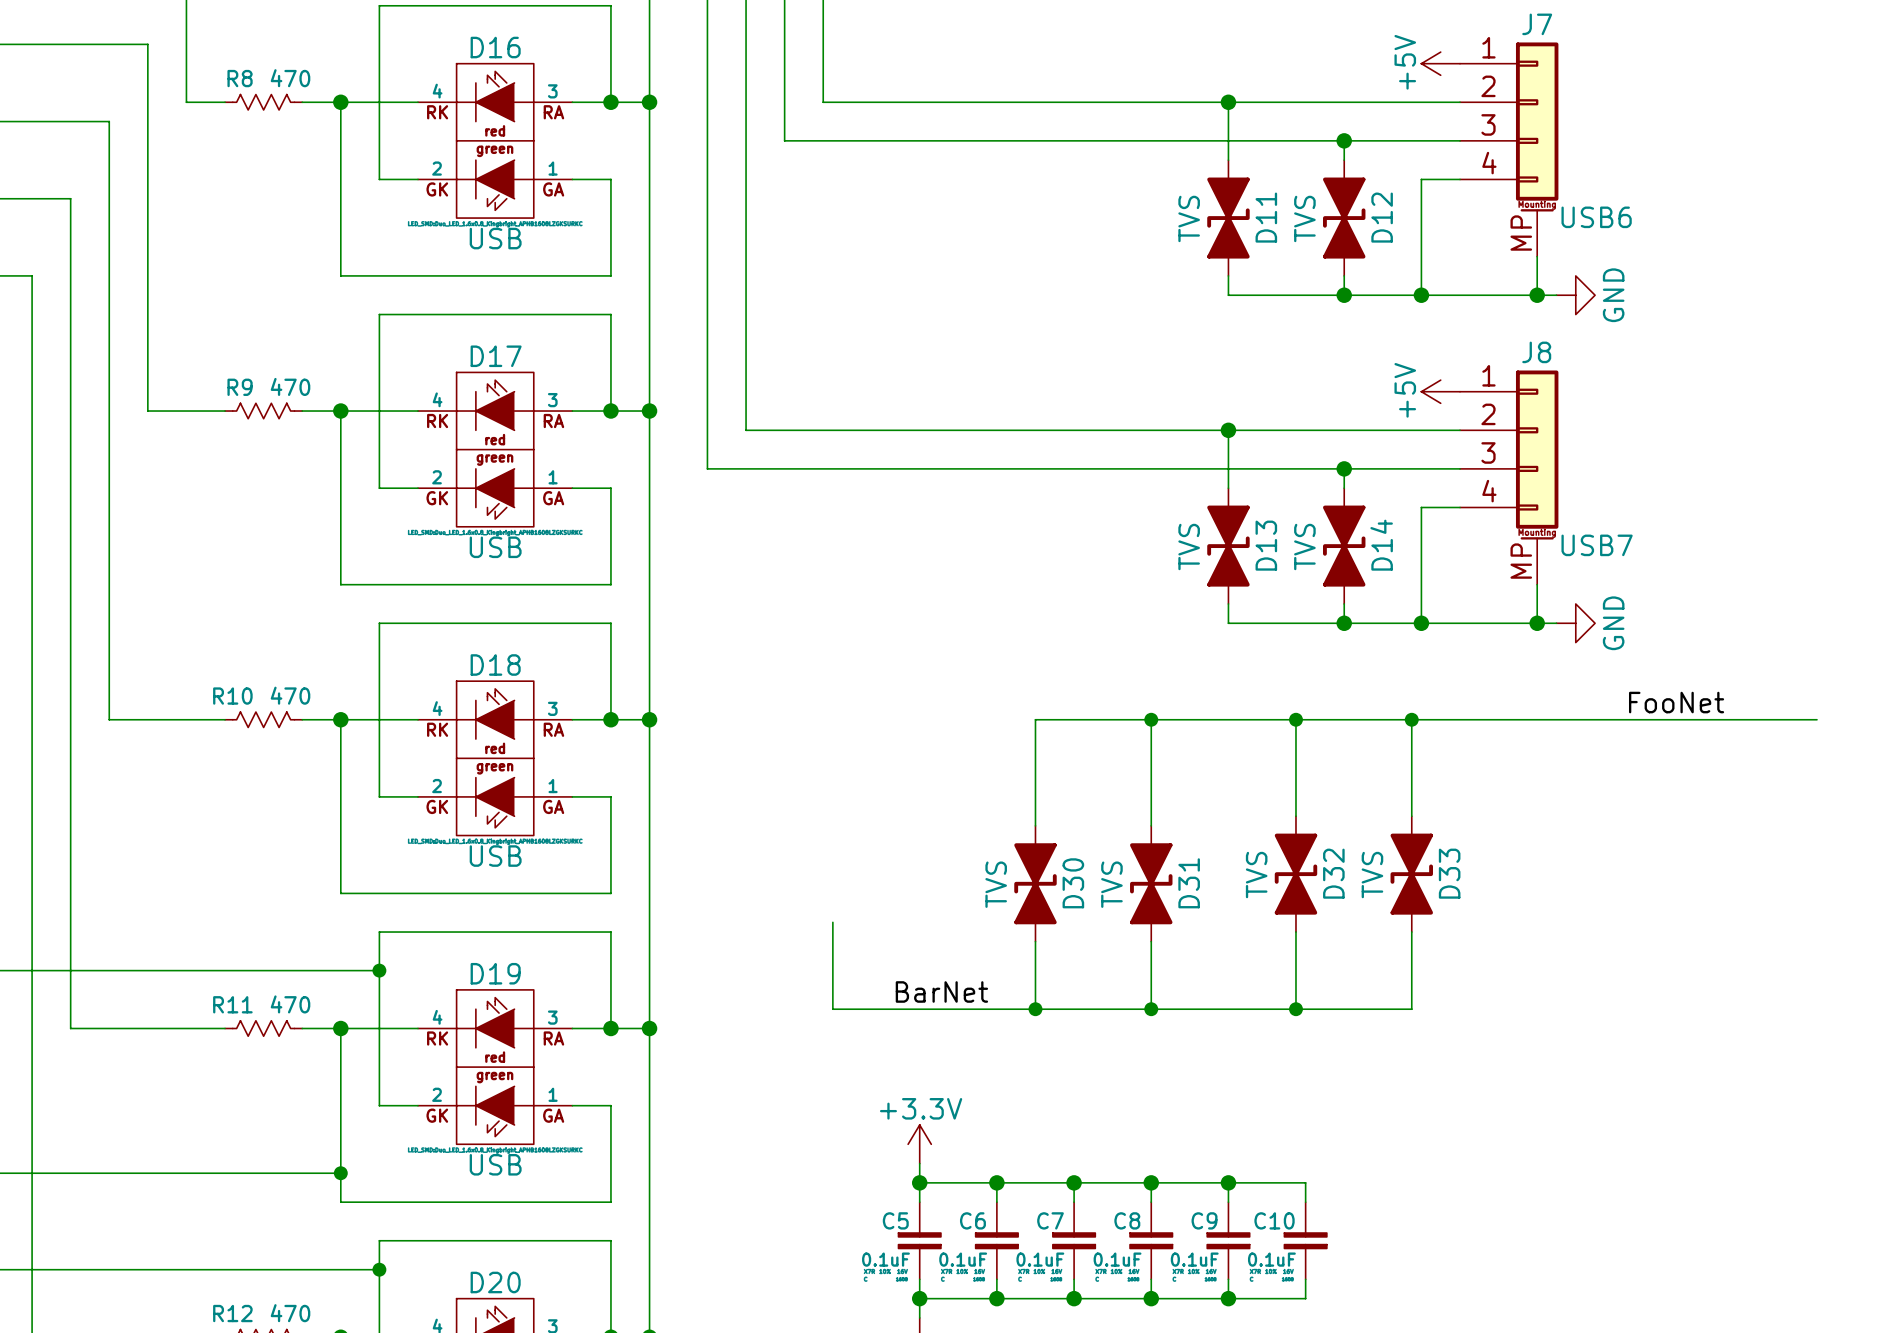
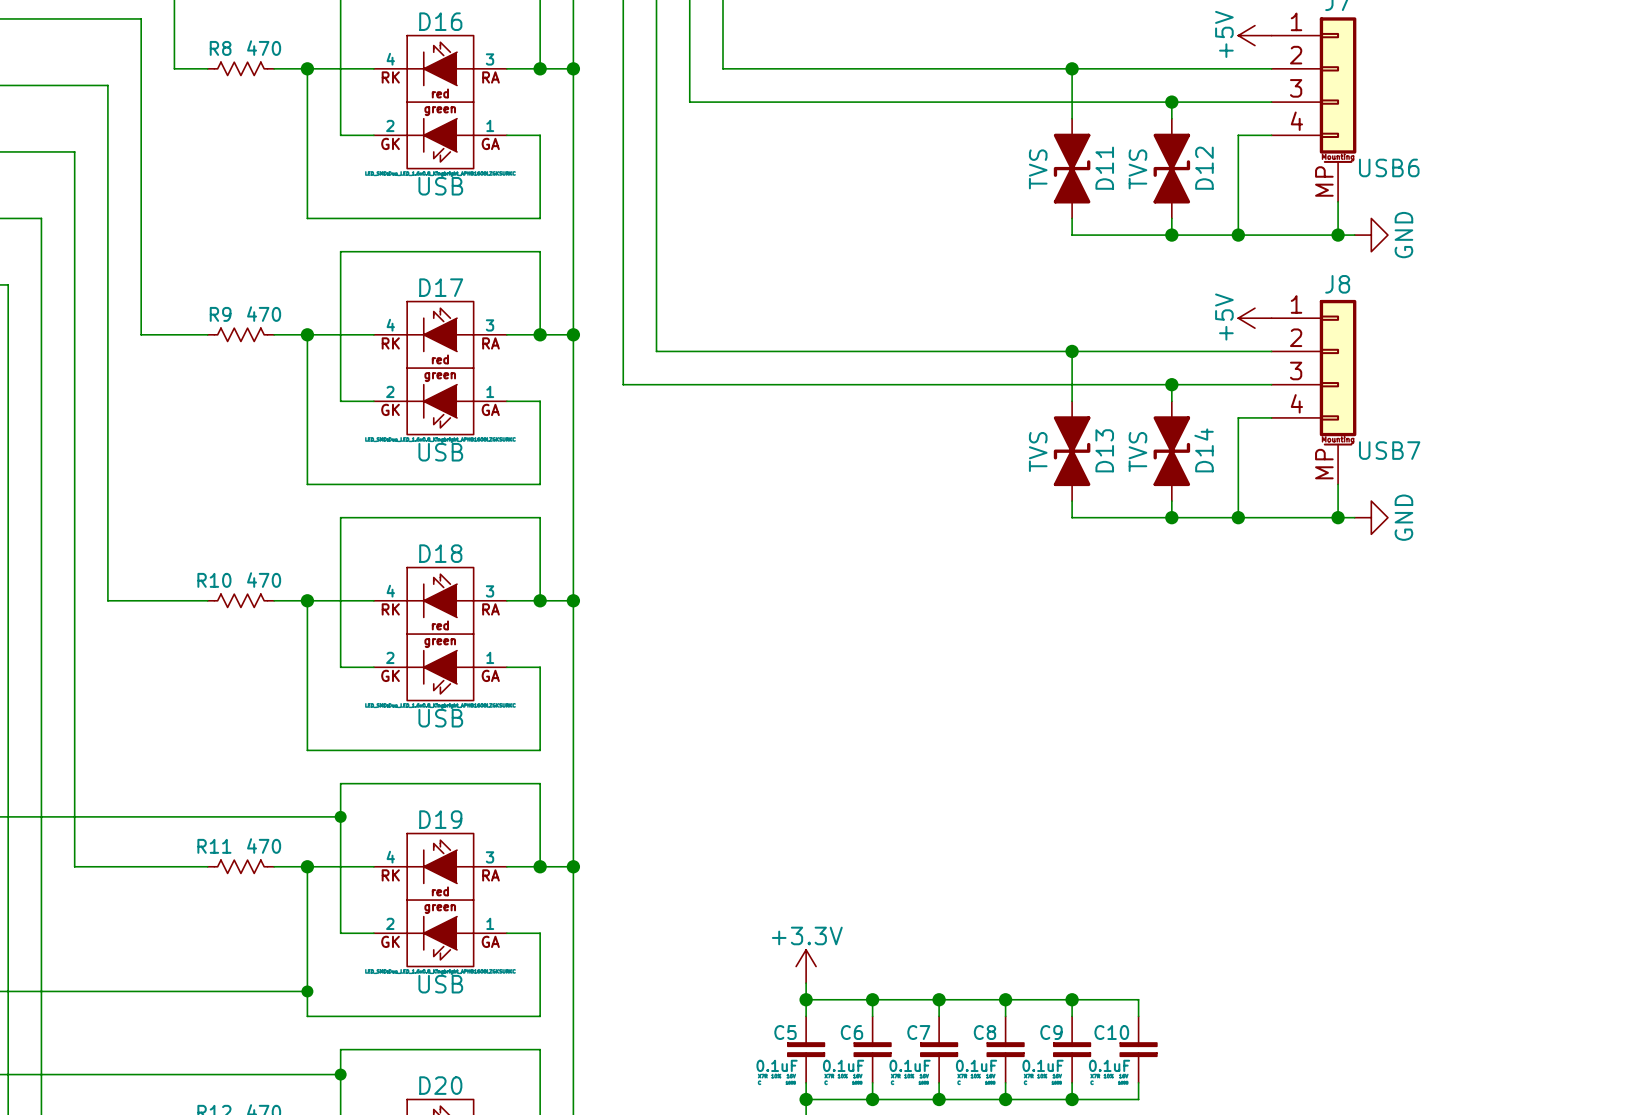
label: FooNet (1676, 702) -> none
wire: (1151, 719) (1151, 825) -> none
junction: (1151, 719) -> none
wire: (1295, 719) (1295, 816) -> none
junction: (1295, 719) -> none
wire: (1411, 719) (1411, 816) -> none
junction: (1411, 719) -> none
wire: (1816, 719) (1035, 719) (1035, 825) -> none
D32: TVS (1295, 874) -> none
D33: TVS (1411, 874) -> none
D30: TVS (1035, 883) -> none
D31: TVS (1151, 883) -> none
wire: (832, 922) (832, 1009) (1411, 1009) (1411, 932) -> none
wire: (1295, 932) (1295, 1009) -> none
wire: (1035, 941) (1035, 1009) -> none
wire: (1151, 941) (1151, 1009) -> none
label: BarNet (941, 991) -> none
junction: (1035, 1009) -> none
junction: (1151, 1009) -> none
junction: (1295, 1009) -> none

